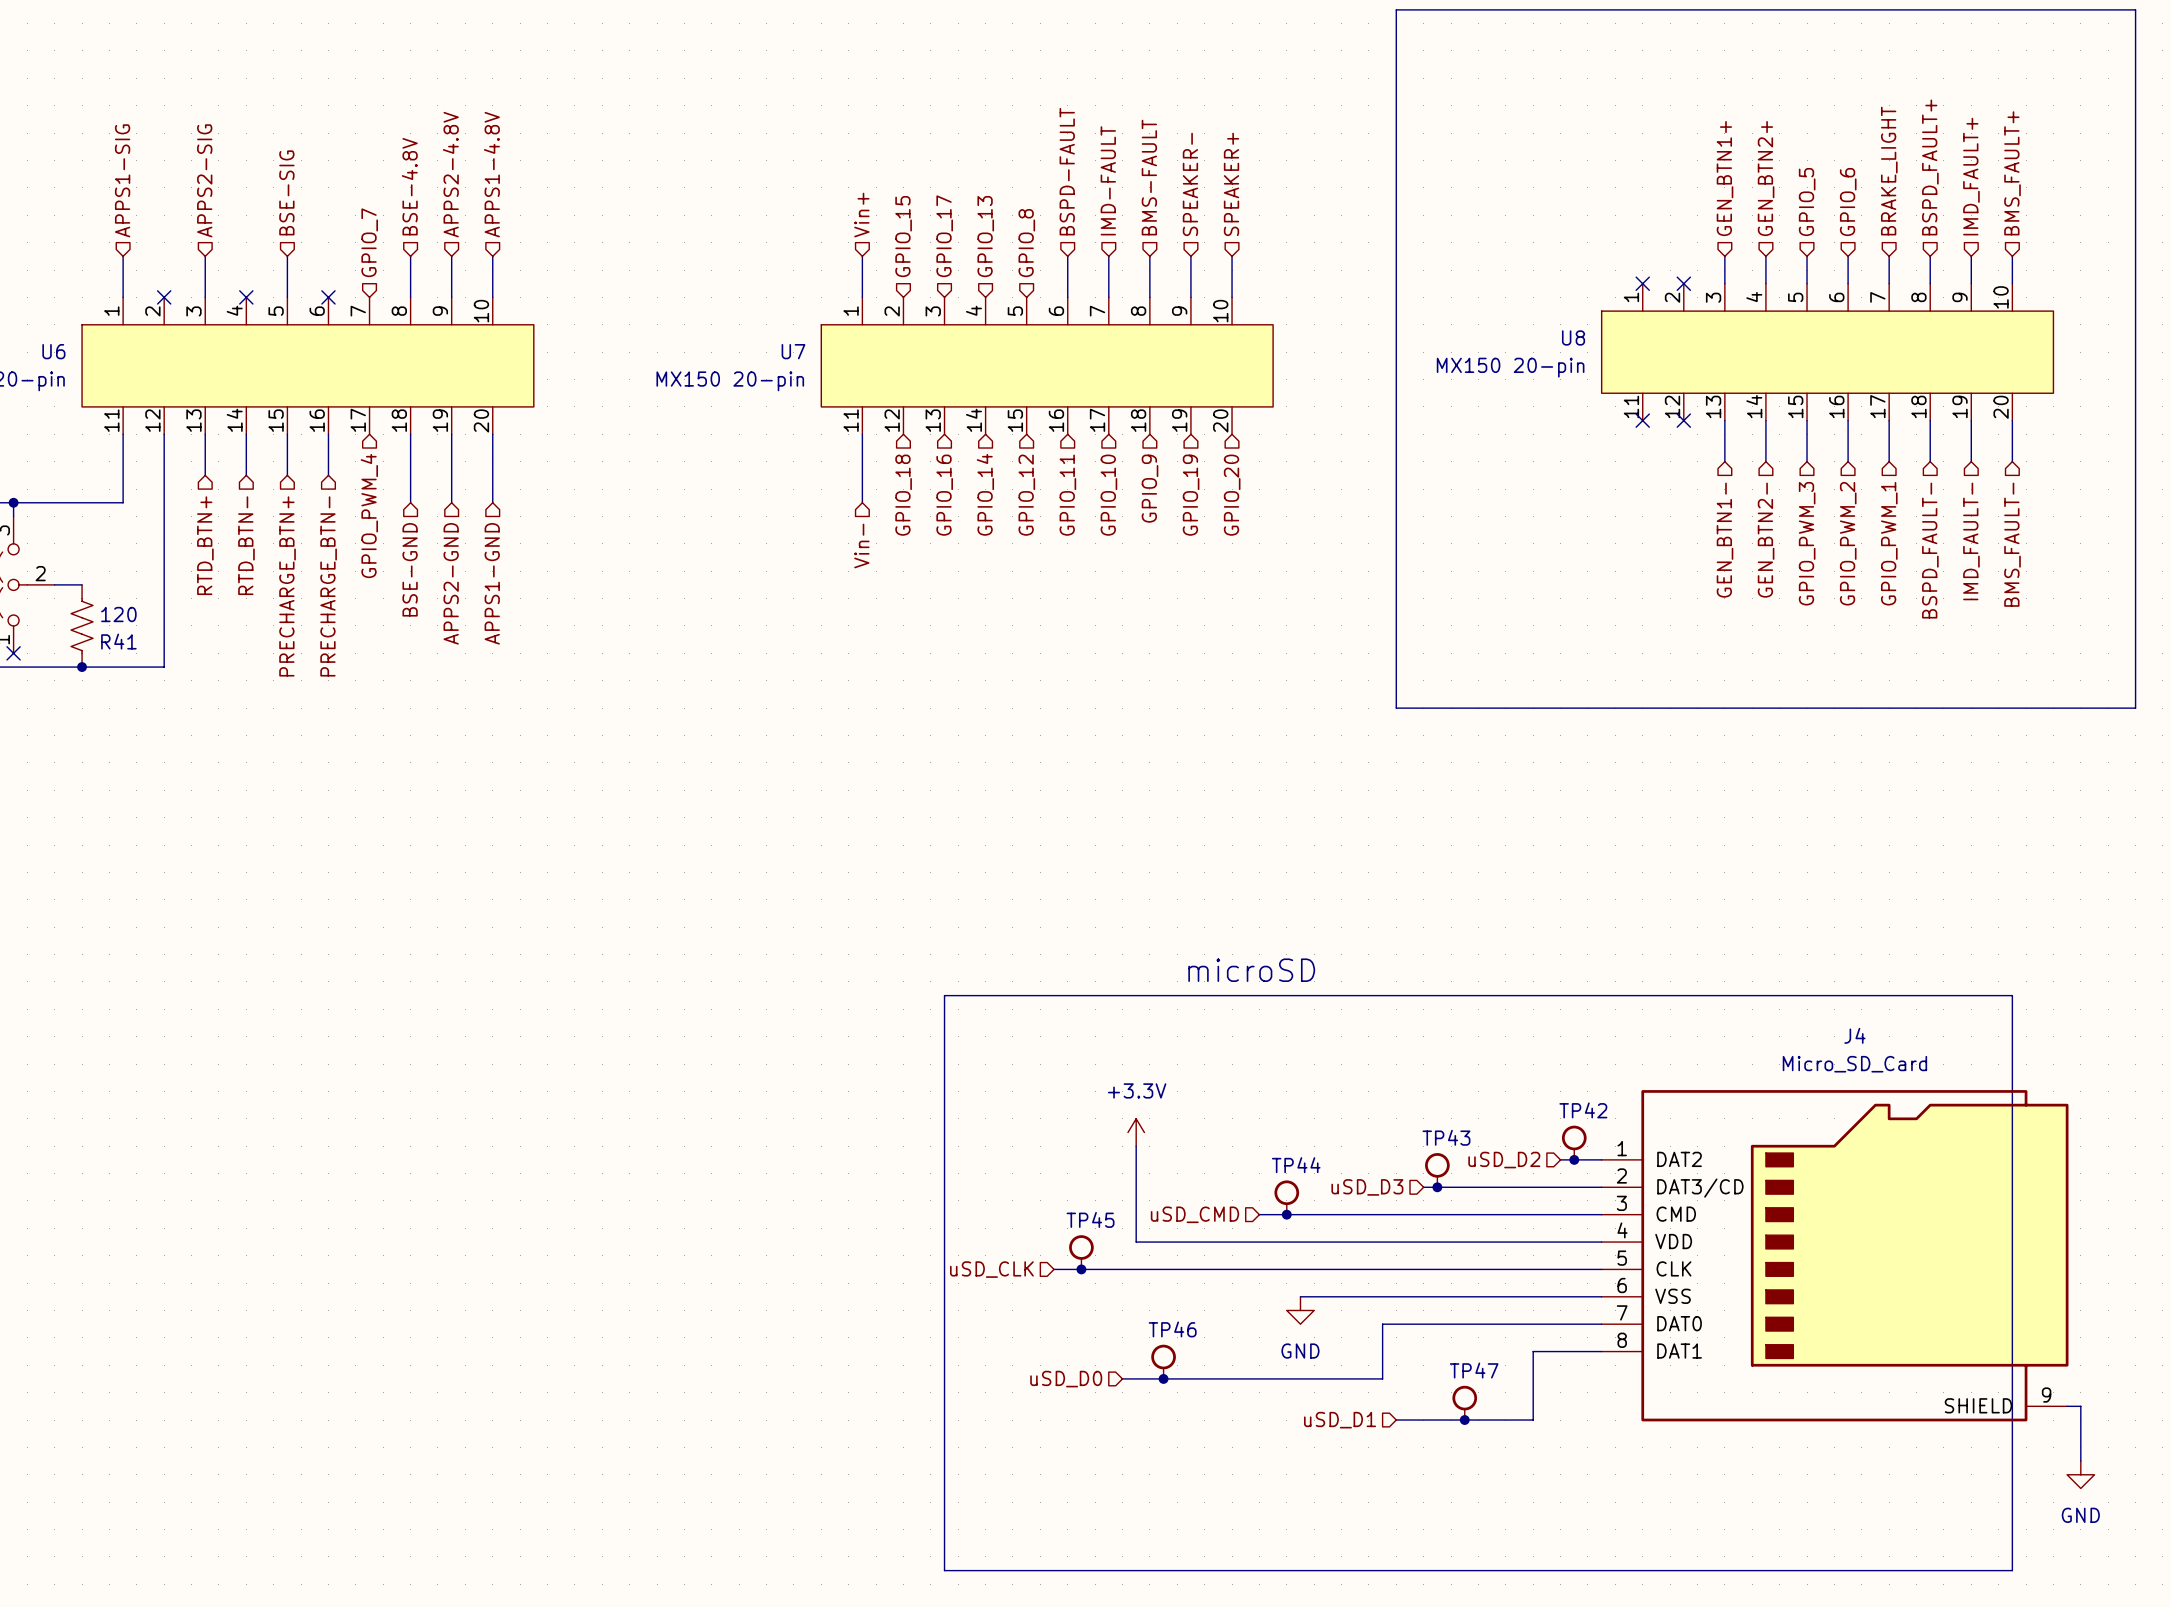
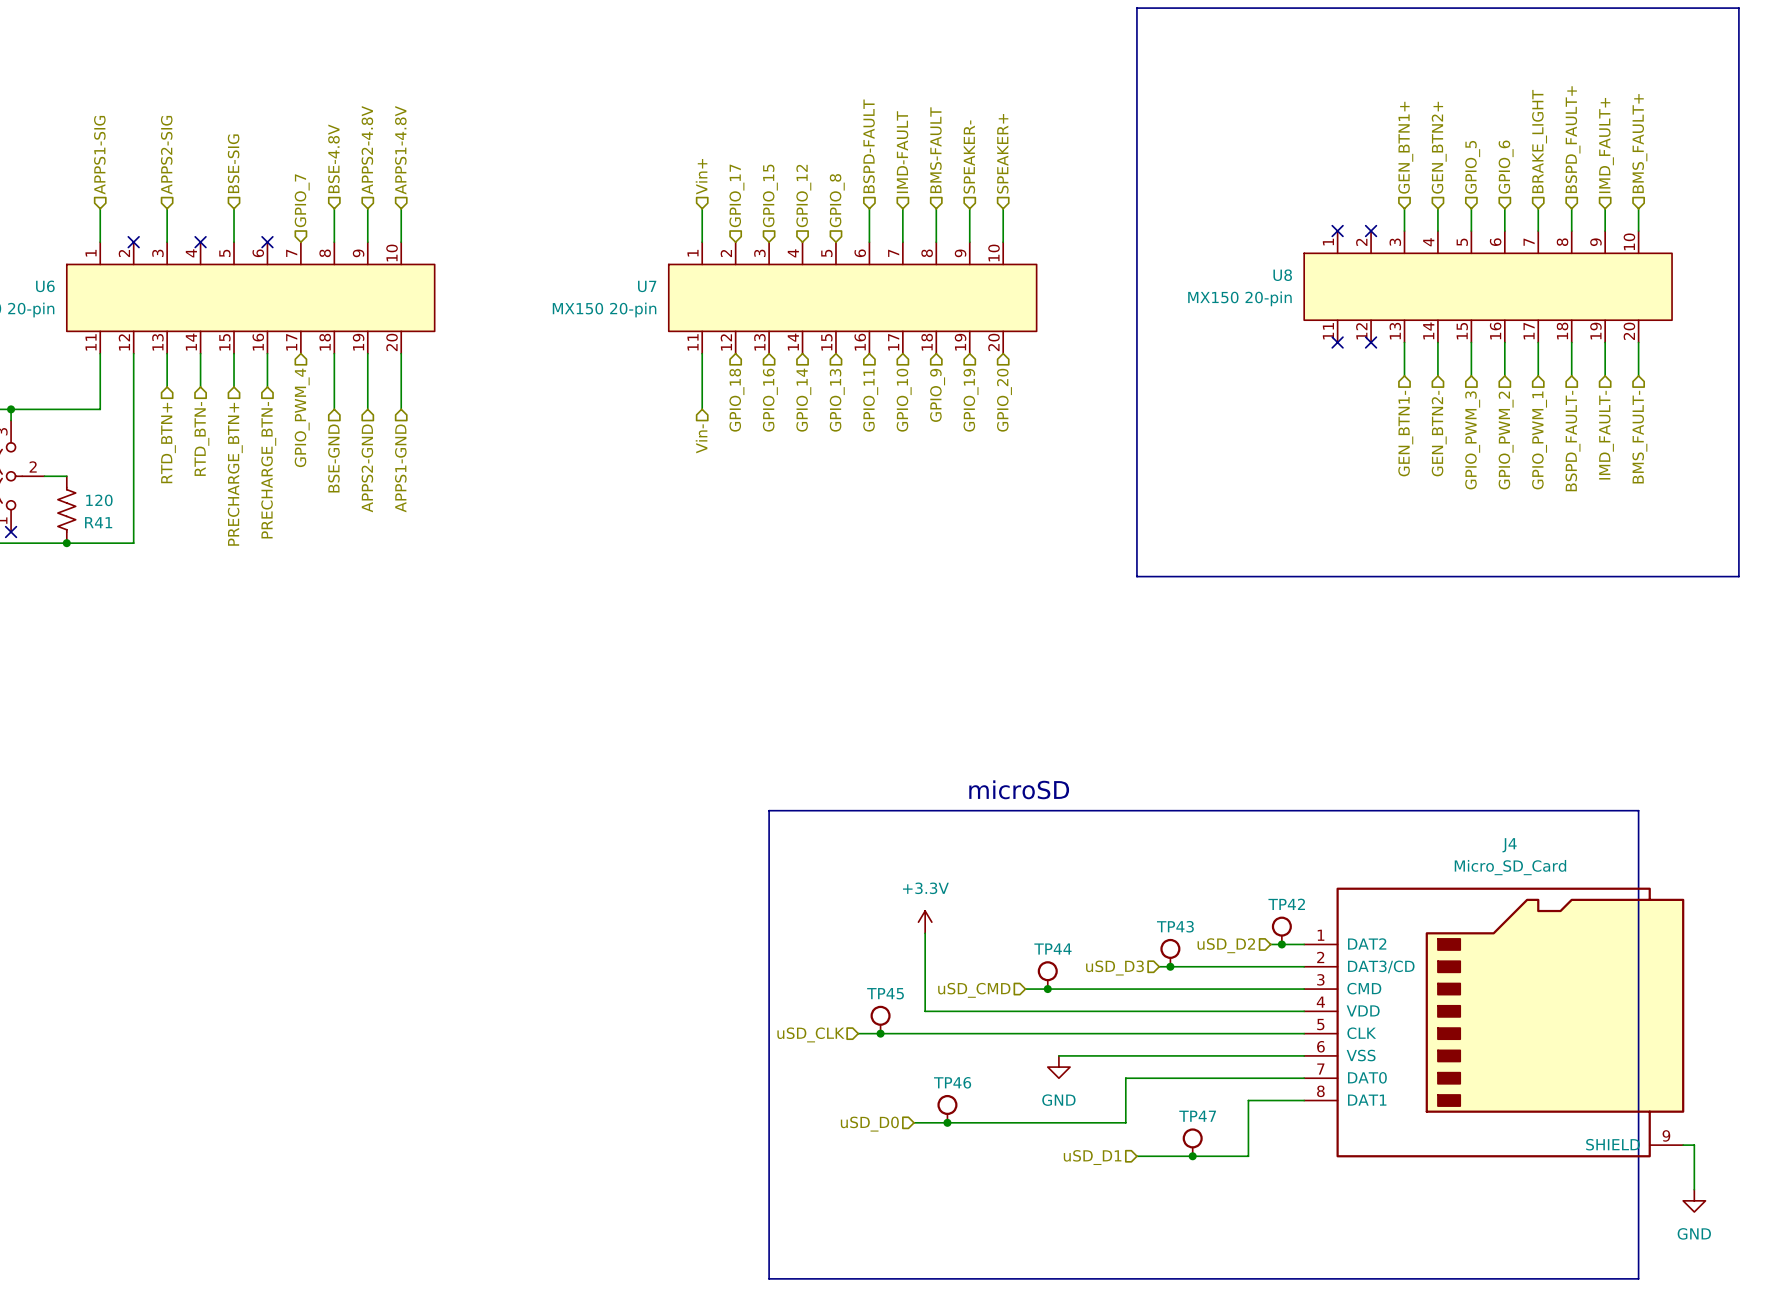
hierarchical label: GPIO_15 (903, 236) -> GPIO_17 (736, 195)
hierarchical label: GPIO_17 (944, 236) -> GPIO_15 (770, 195)
hierarchical label: GPIO_13 (985, 236) -> GPIO_12 (803, 195)
hierarchical label: GPIO_12 (1026, 495) -> GPIO_13 (837, 400)

